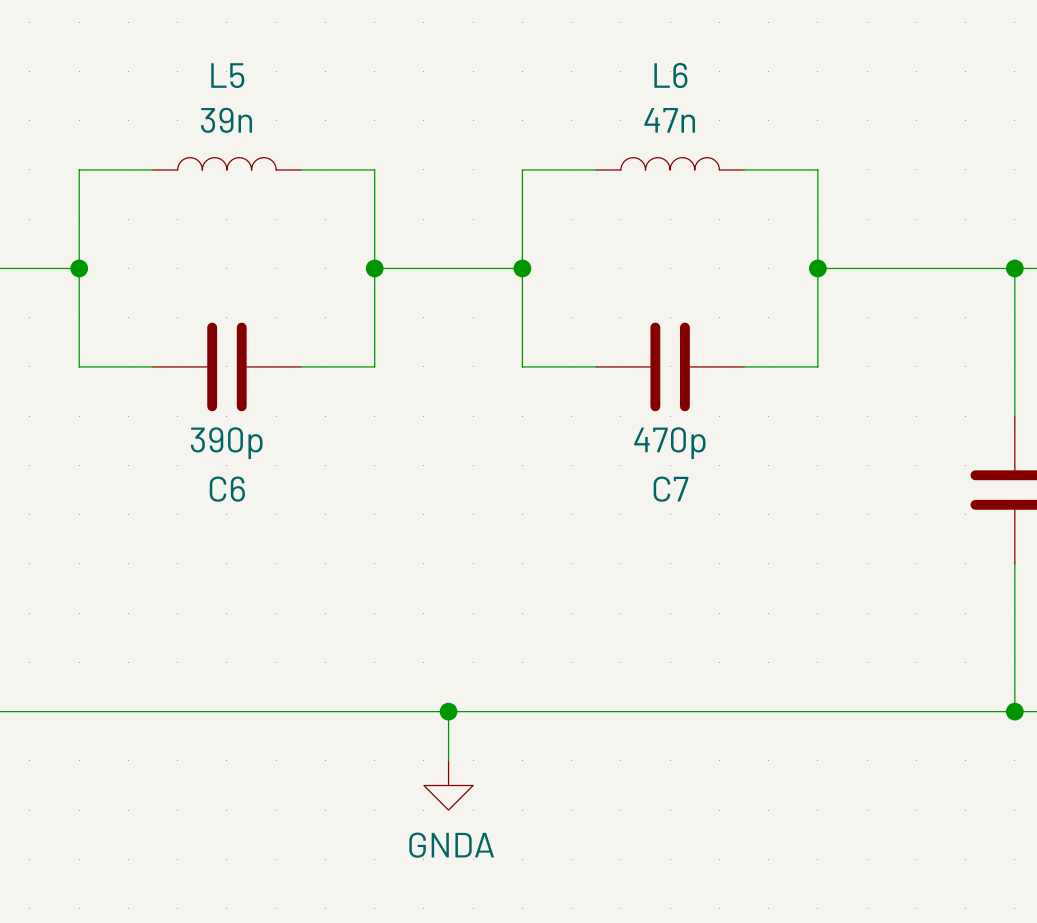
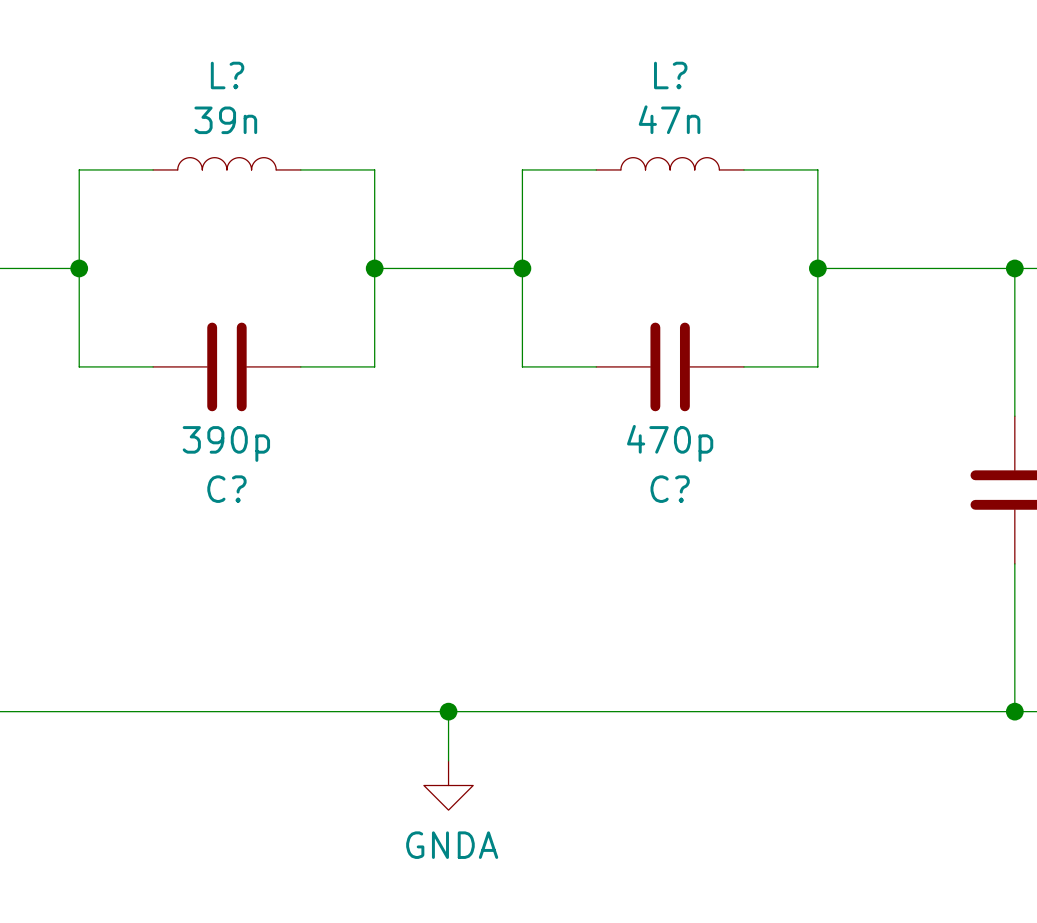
L5 name: L5 (227, 75) -> L? (227, 75)
L6 name: L6 (670, 75) -> L? (670, 75)
C6 name: C6 (227, 489) -> C? (226, 489)
C7 name: C7 (671, 489) -> C? (670, 489)

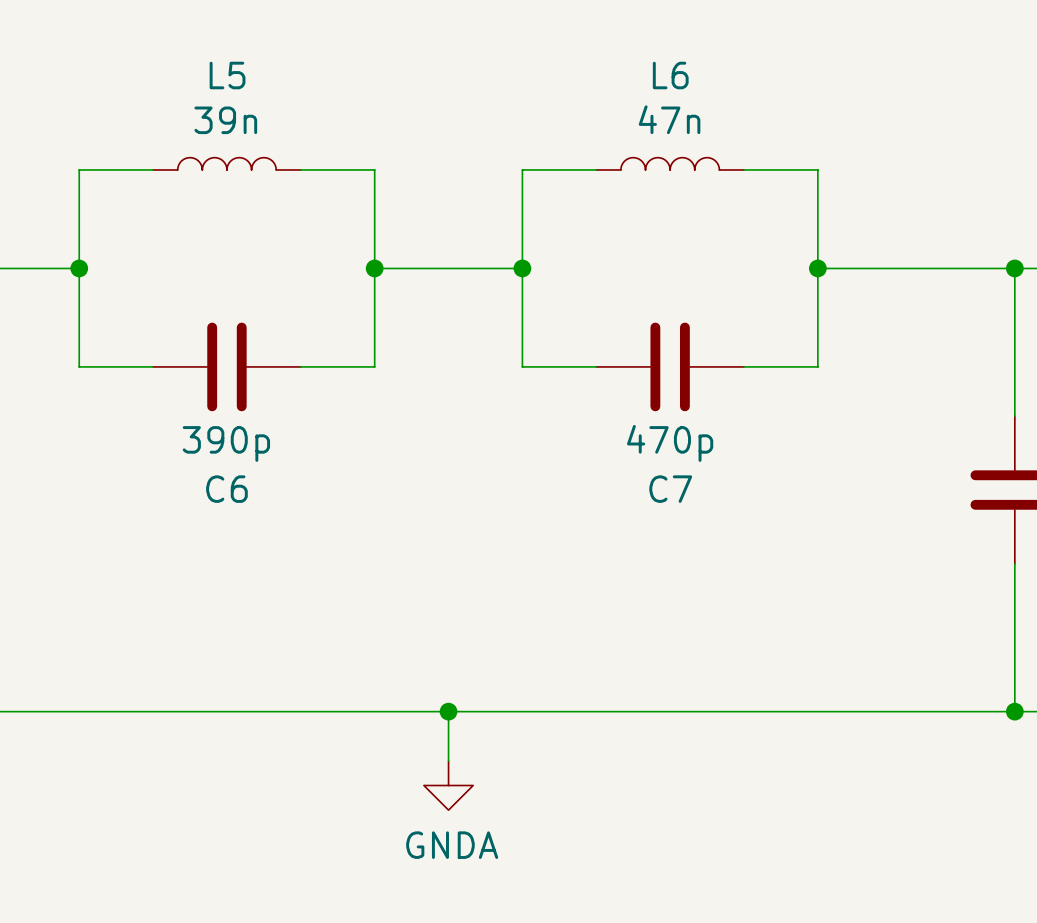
L? name: L? (227, 75) -> L5 (227, 75)
L? name: L? (670, 75) -> L6 (670, 75)
C? name: C? (226, 489) -> C6 (226, 489)
C? name: C? (670, 489) -> C7 (670, 489)

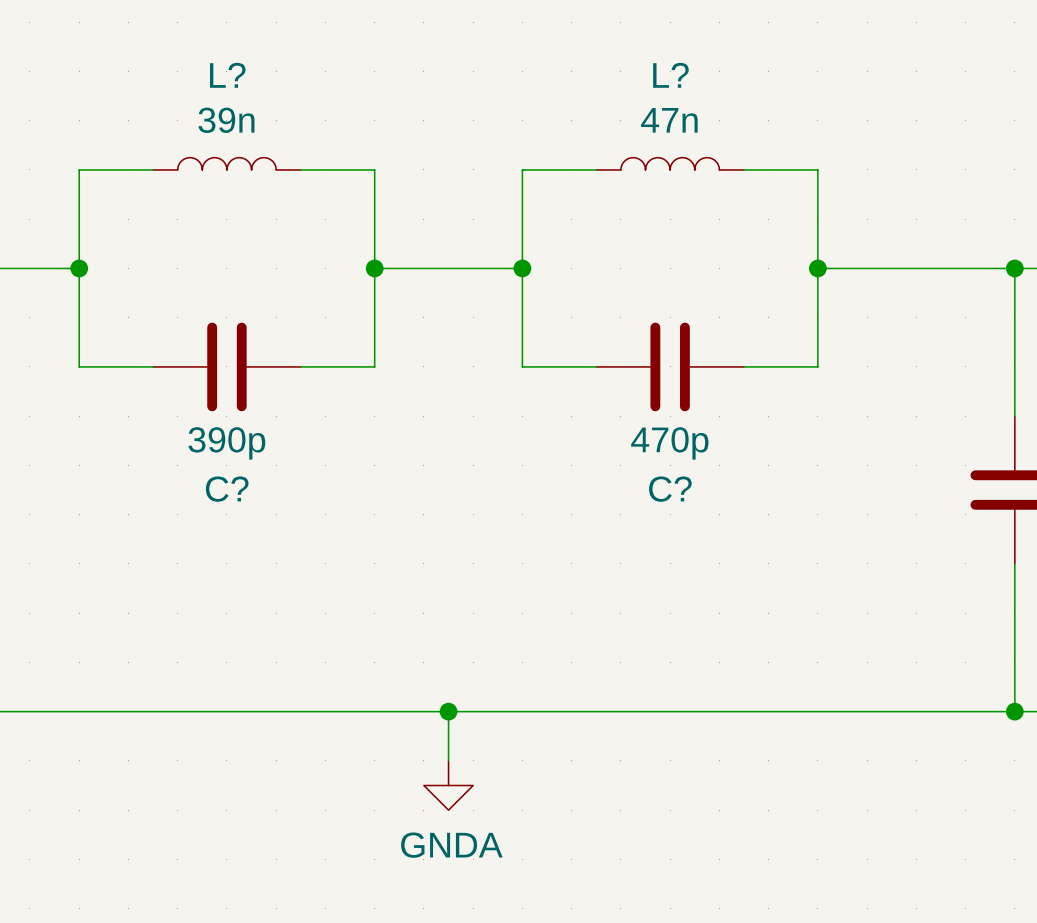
L5 name: L5 (227, 75) -> L? (227, 75)
L6 name: L6 (670, 75) -> L? (670, 75)
C6 name: C6 (226, 489) -> C? (227, 489)
C7 name: C7 (670, 489) -> C? (670, 489)

